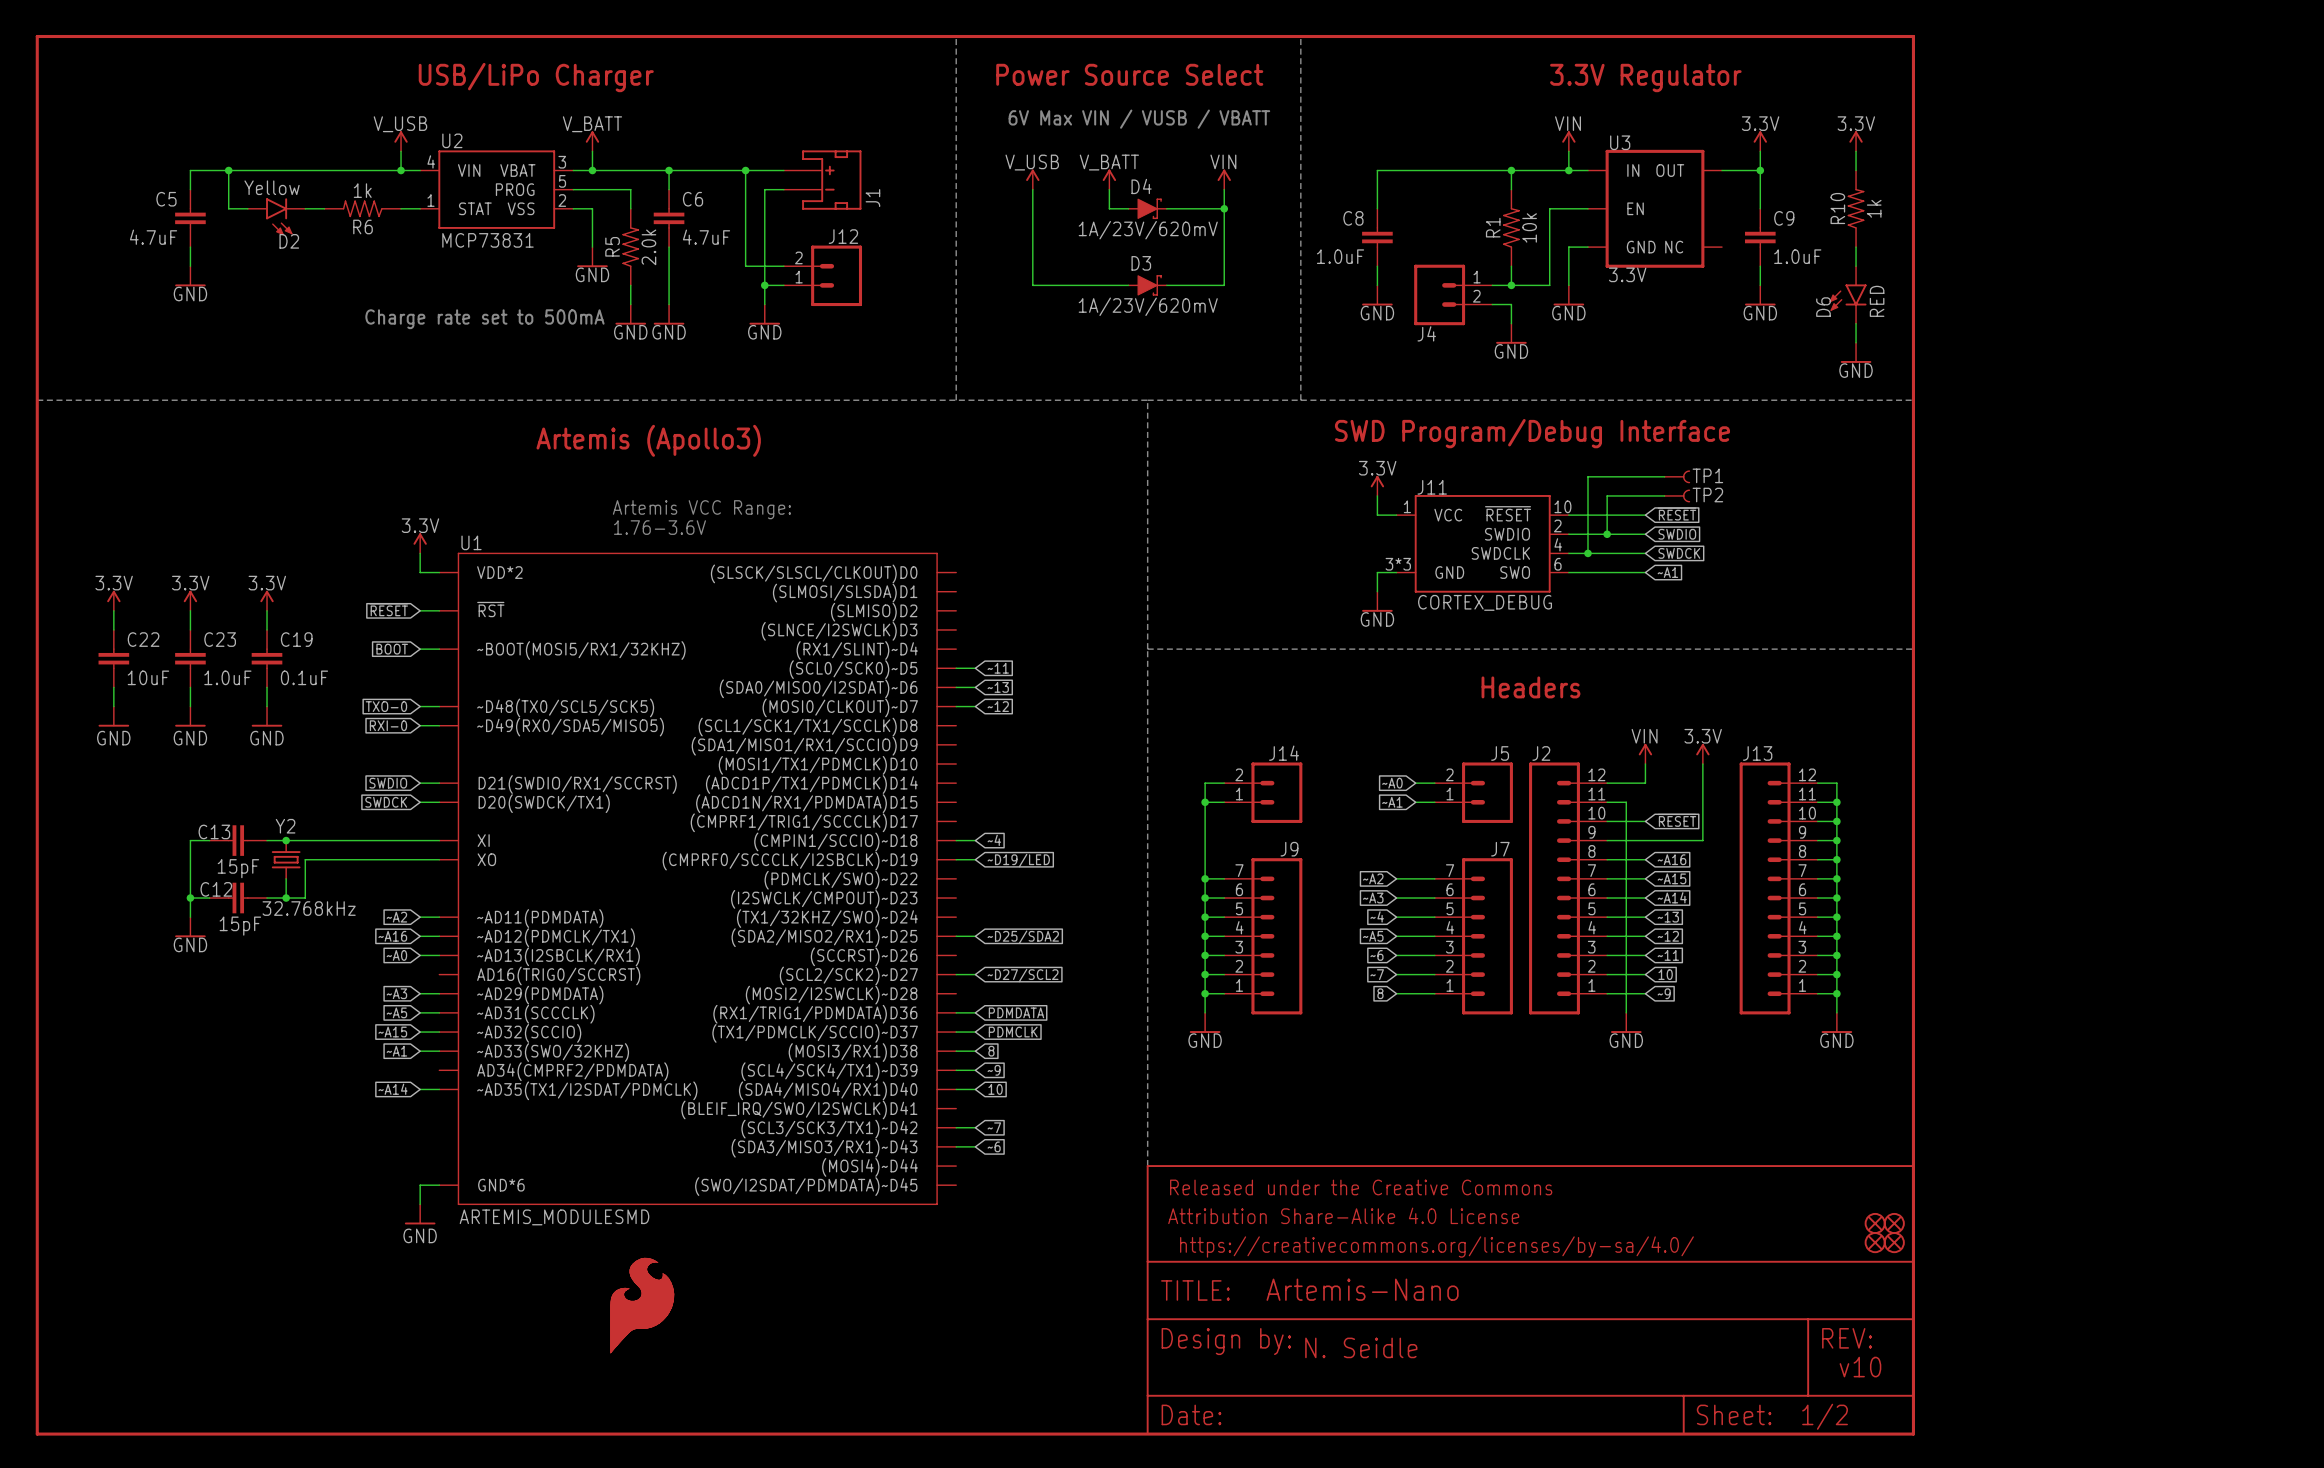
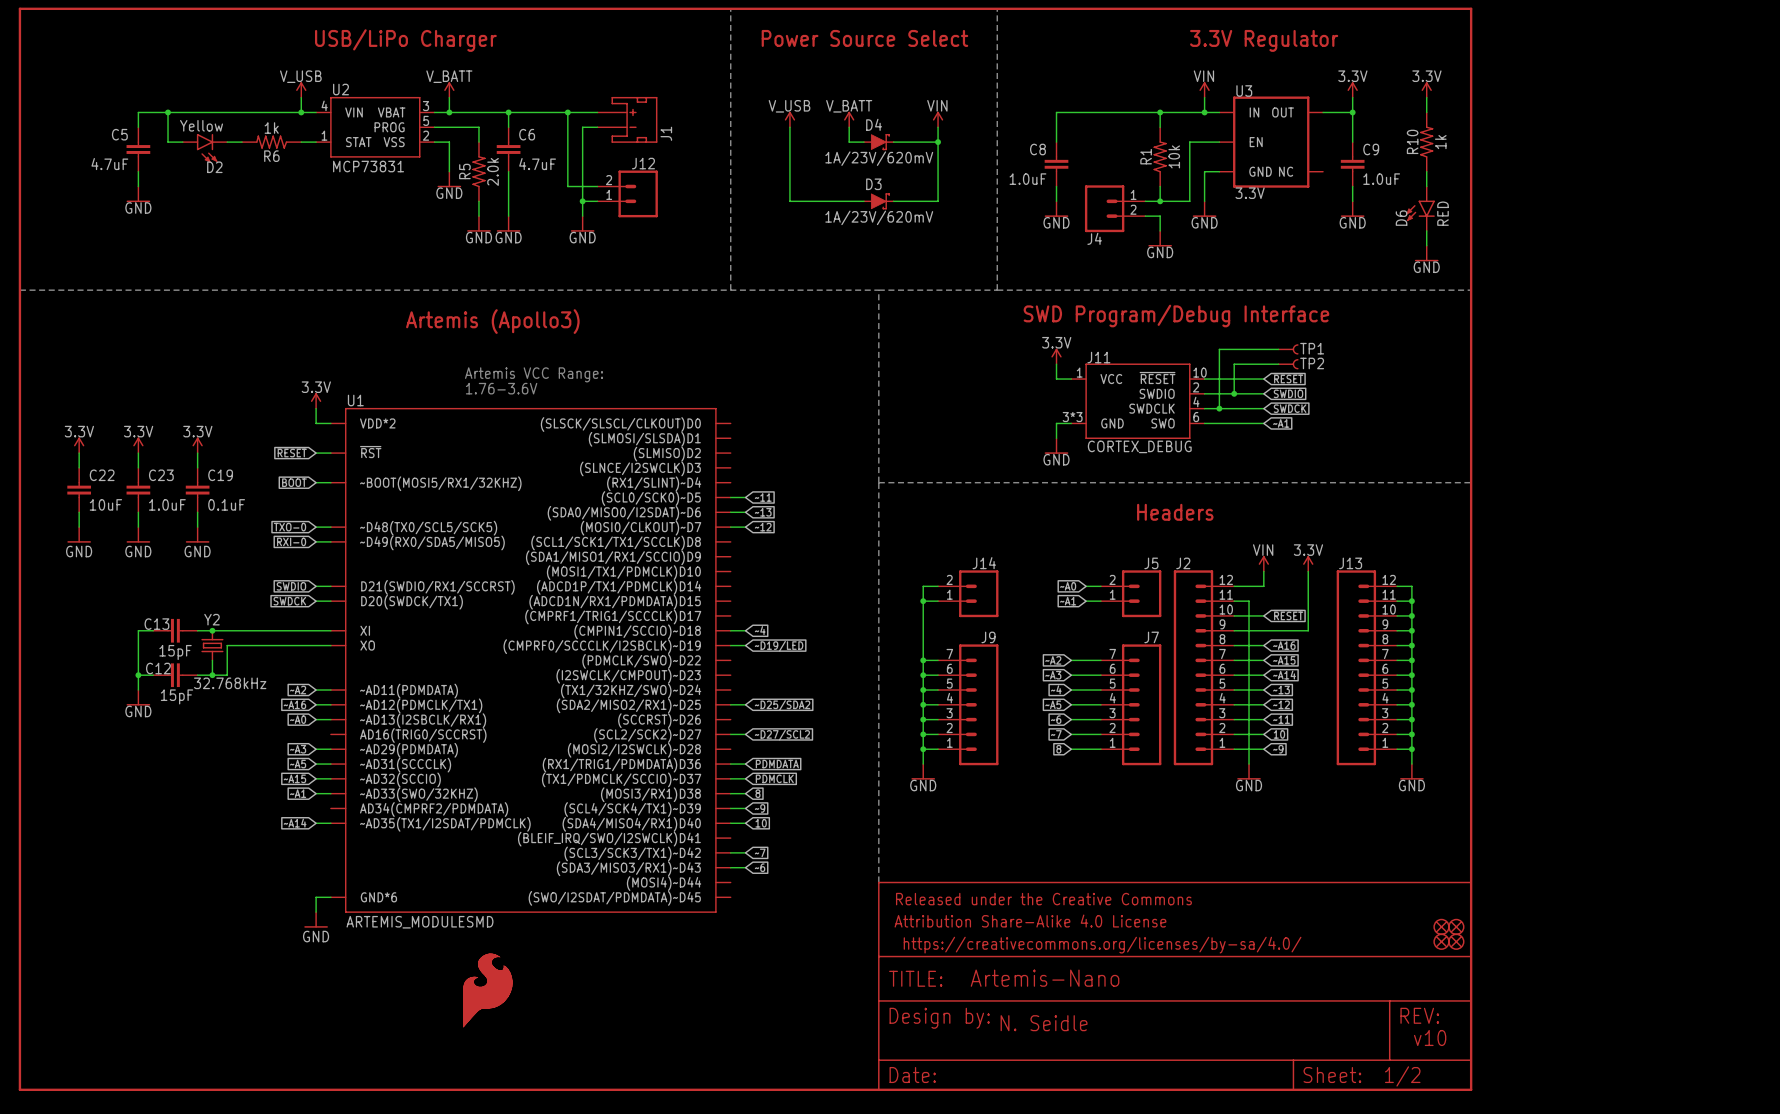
text: 6V Max VIN / VUSB / VBATT (1139, 119) -> none
text: Charge rate set to 500mA (484, 319) -> none

